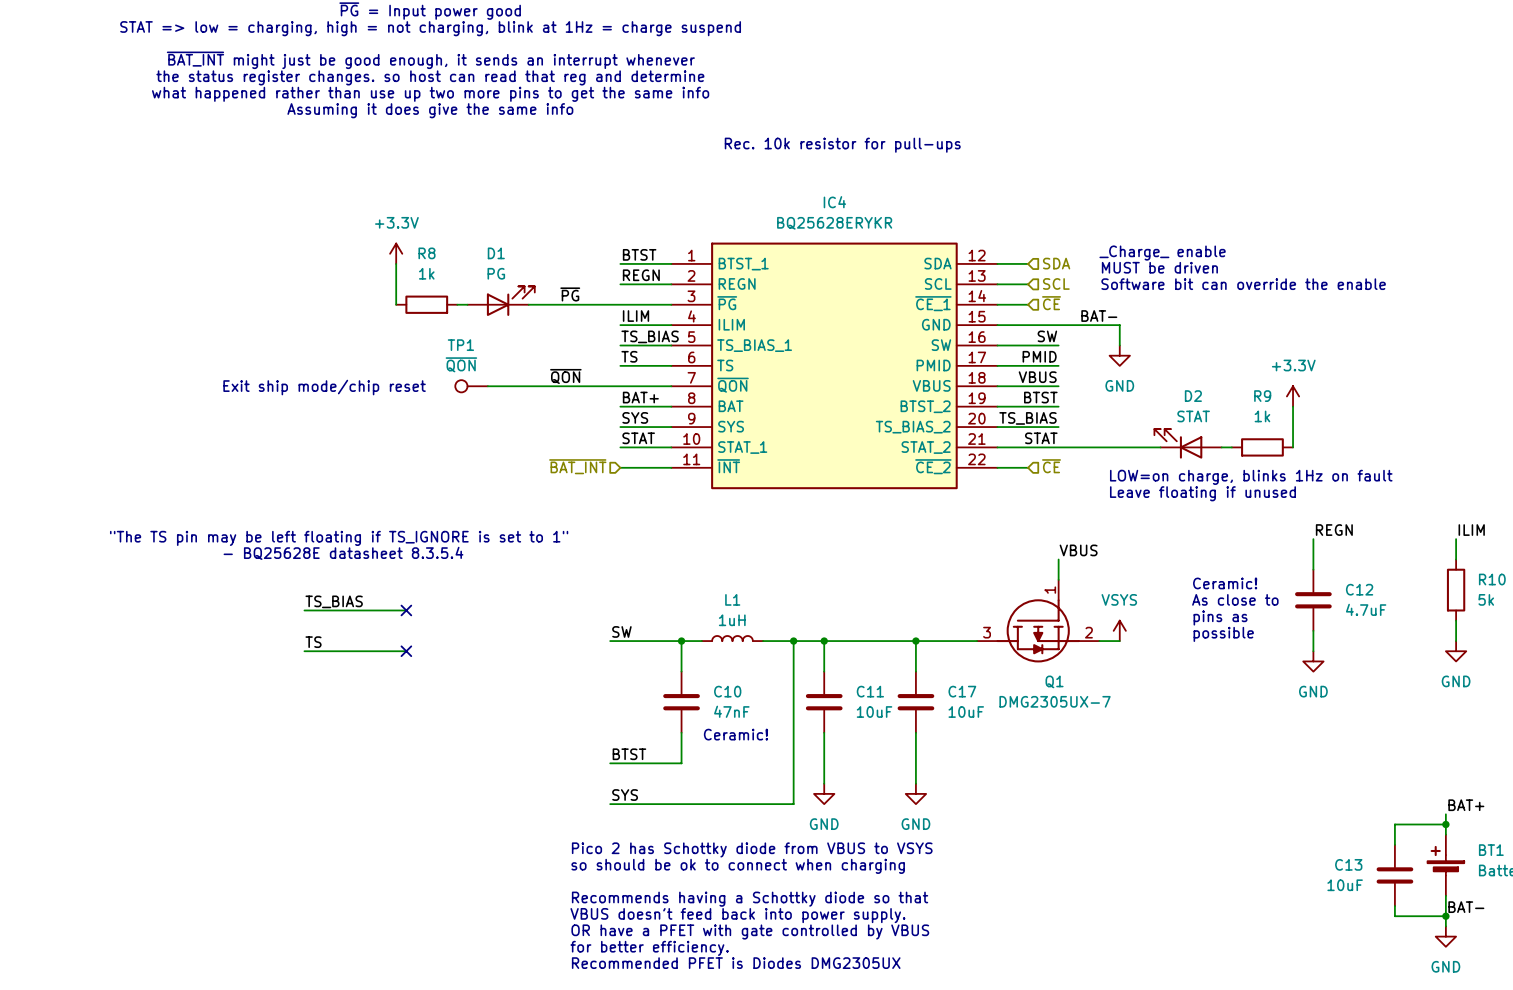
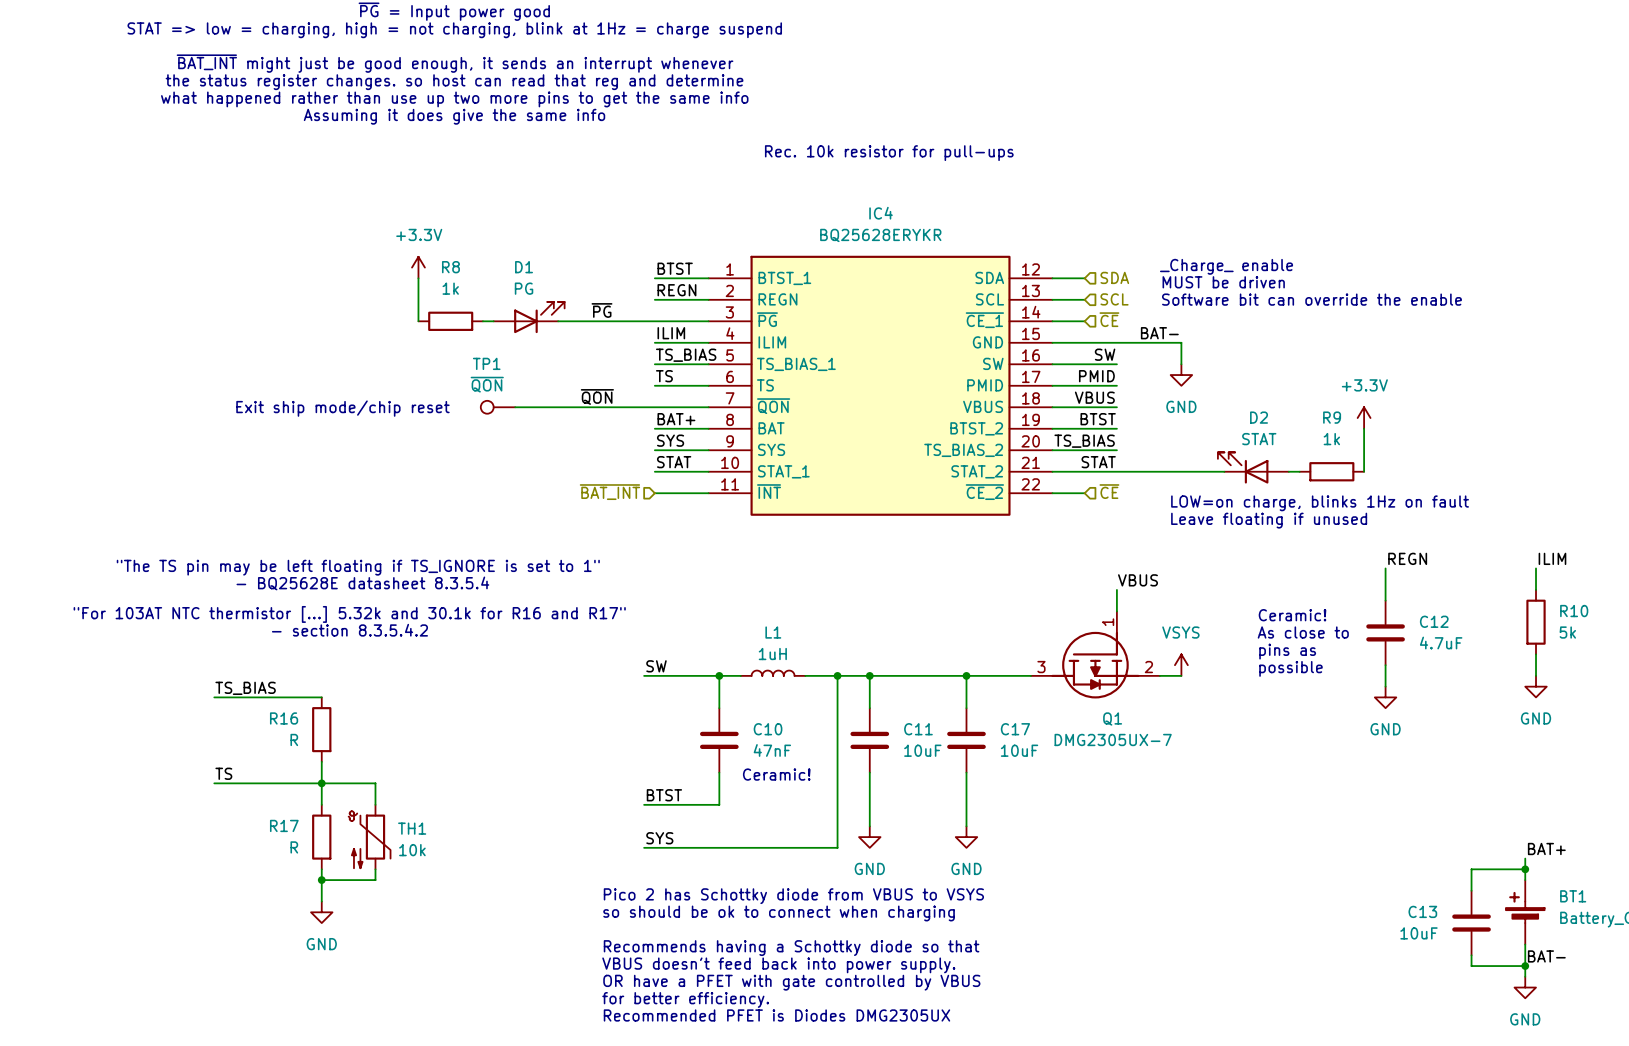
text: none -> "For 103AT NTC thermistor [...] 5.32k and 30.1k for R16 and R17" (349, 614)
text: none -> - section 8.3.5.4.2 (349, 630)
label position: TS_BIAS (334, 601) -> TS_BIAS (245, 688)
wire: (304, 610) (406, 610) -> none
no-connect mark: (406, 610) -> none
label position: TS (313, 642) -> TS (223, 773)
wire: (304, 651) (406, 651) -> (214, 697) (321, 697)
no-connect mark: (406, 651) -> none
R16: none -> R (321, 729)
wire: none -> (321, 761) (321, 804)
wire: none -> (214, 783) (375, 783) (375, 804)
junction: none -> (321, 783)
R17: none -> R (321, 837)
TH1: none -> 10k (369, 837)
wire: none -> (321, 869) (321, 901)
wire: none -> (375, 869) (375, 880) (321, 880)
junction: none -> (321, 880)
power symbol: none -> GND (321, 912)

